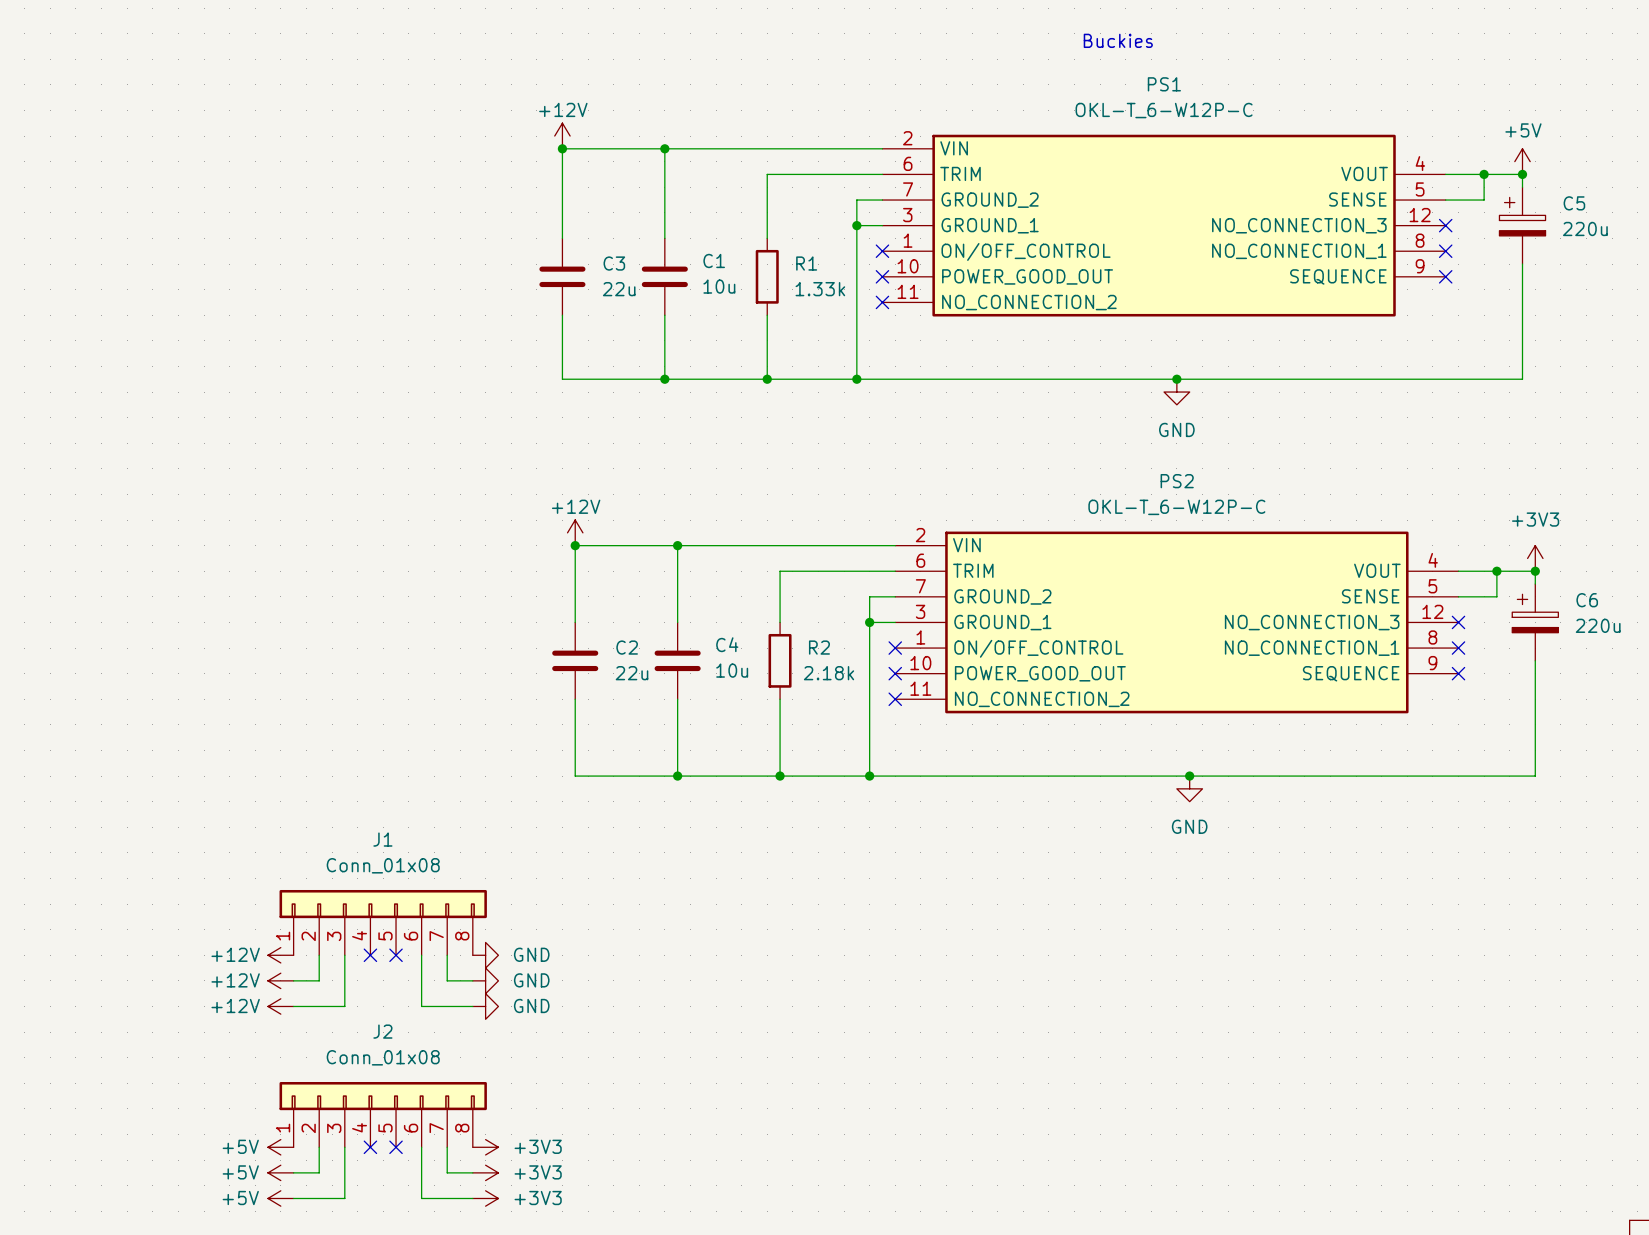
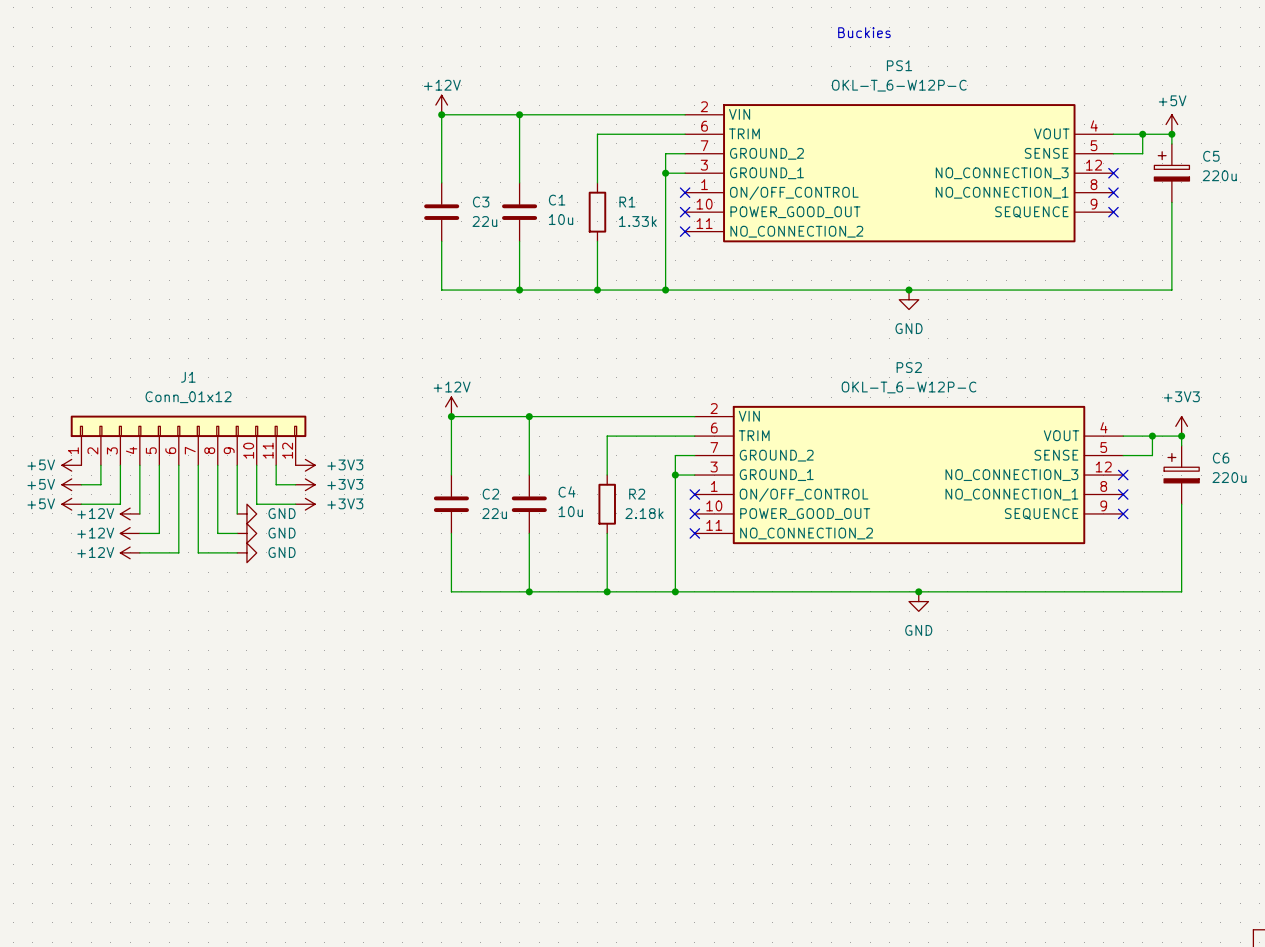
power symbol: none -> +5V (71, 465)
wire: none -> (100, 465) (100, 484) (81, 484)
wire: none -> (120, 465) (120, 504) (81, 504)
wire: none -> (139, 465) (139, 513)
wire: none -> (159, 465) (159, 533) (139, 533)
wire: none -> (178, 465) (178, 552) (139, 552)
wire: none -> (198, 465) (198, 552) (237, 552)
wire: none -> (217, 465) (217, 533) (237, 533)
wire: none -> (237, 465) (237, 513)
wire: none -> (256, 465) (256, 504) (295, 504)
wire: none -> (276, 465) (276, 484) (295, 484)
power symbol: none -> +3V3 (305, 465)
power symbol: none -> +5V (71, 484)
power symbol: none -> +3V3 (305, 484)
power symbol: none -> +5V (71, 504)
power symbol: none -> +3V3 (305, 504)
power symbol: none -> +12V (130, 513)
power symbol: none -> GND (246, 513)
power symbol: none -> +12V (130, 533)
power symbol: none -> GND (246, 533)
power symbol: none -> +12V (130, 552)
power symbol: none -> GND (246, 552)
J1 value: Conn_01x08 (383, 865) -> Conn_01x12 (188, 397)
J1 symbol: [279, 889, 487, 956] -> [70, 415, 307, 466]
power symbol: +12V (280, 955) -> none
wire: (319, 955) (319, 980) (293, 980) -> none
wire: (344, 955) (344, 1006) (293, 1006) -> none
no-connect mark: (370, 955) -> none
no-connect mark: (396, 955) -> none
wire: (421, 955) (421, 1006) (472, 1006) -> none
wire: (447, 955) (447, 980) (472, 980) -> none
power symbol: GND (485, 955) -> none
power symbol: +12V (280, 980) -> none
power symbol: GND (485, 980) -> none
power symbol: +12V (280, 1006) -> none
power symbol: GND (485, 1006) -> none
J2: Conn_01x08 (383, 1114) -> none
power symbol: +5V (280, 1147) -> none
wire: (319, 1147) (319, 1172) (293, 1172) -> none
wire: (344, 1147) (344, 1198) (293, 1198) -> none
no-connect mark: (370, 1147) -> none
no-connect mark: (396, 1147) -> none
wire: (421, 1147) (421, 1198) (472, 1198) -> none
wire: (447, 1147) (447, 1172) (472, 1172) -> none
power symbol: +3V3 (485, 1147) -> none
power symbol: +5V (280, 1172) -> none
power symbol: +3V3 (485, 1172) -> none
power symbol: +5V (280, 1198) -> none
power symbol: +3V3 (485, 1198) -> none

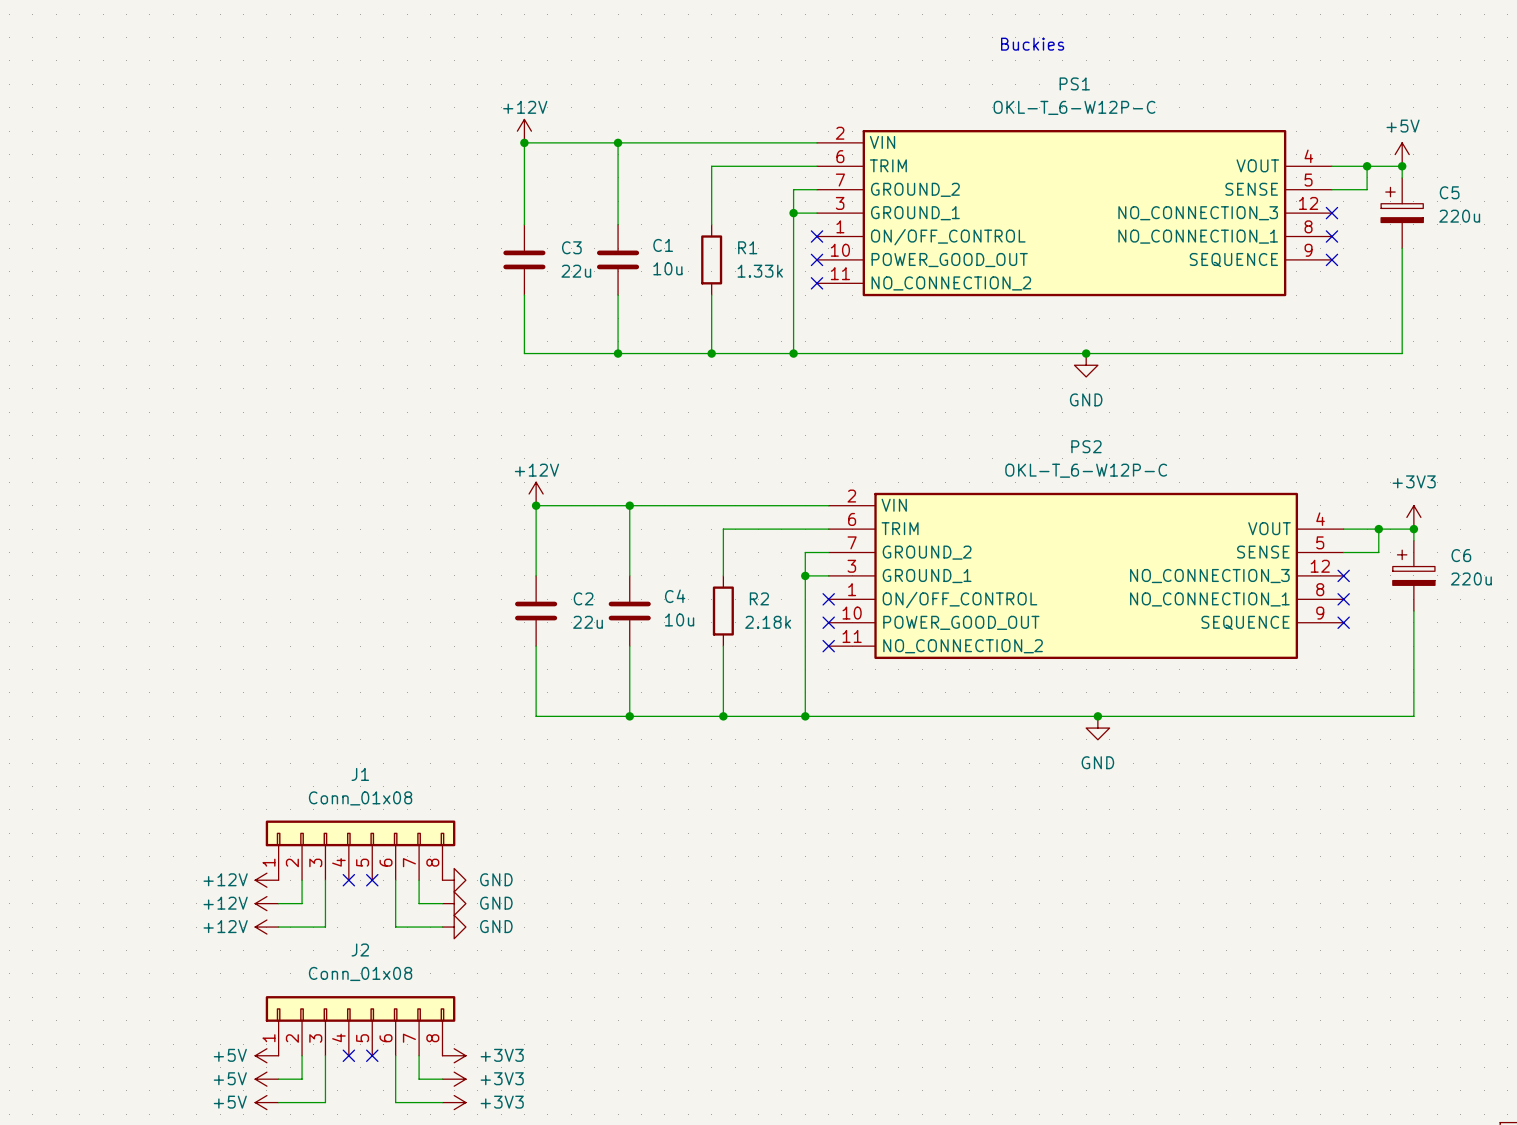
J1 value: Conn_01x12 (188, 397) -> Conn_01x08 (360, 798)
J1 symbol: [70, 415, 307, 466] -> [265, 820, 456, 881]
power symbol: +5V (71, 465) -> none
wire: (100, 465) (100, 484) (81, 484) -> none
wire: (120, 465) (120, 504) (81, 504) -> none
wire: (139, 465) (139, 513) -> none
wire: (159, 465) (159, 533) (139, 533) -> none
wire: (178, 465) (178, 552) (139, 552) -> none
wire: (198, 465) (198, 552) (237, 552) -> none
wire: (217, 465) (217, 533) (237, 533) -> none
wire: (237, 465) (237, 513) -> none
wire: (256, 465) (256, 504) (295, 504) -> none
wire: (276, 465) (276, 484) (295, 484) -> none
power symbol: +3V3 (305, 465) -> none
power symbol: +5V (71, 484) -> none
power symbol: +3V3 (305, 484) -> none
power symbol: +5V (71, 504) -> none
power symbol: +3V3 (305, 504) -> none
power symbol: +12V (130, 513) -> none
power symbol: GND (246, 513) -> none
power symbol: +12V (130, 533) -> none
power symbol: GND (246, 533) -> none
power symbol: +12V (130, 552) -> none
power symbol: GND (246, 552) -> none
power symbol: none -> +12V (266, 880)
wire: none -> (302, 880) (302, 903) (278, 903)
wire: none -> (325, 880) (325, 927) (278, 927)
no-connect mark: none -> (348, 880)
no-connect mark: none -> (372, 880)
wire: none -> (395, 880) (395, 927) (442, 927)
wire: none -> (419, 880) (419, 903) (442, 903)
power symbol: none -> GND (454, 880)
power symbol: none -> +12V (266, 903)
power symbol: none -> GND (454, 903)
power symbol: none -> +12V (266, 927)
power symbol: none -> GND (454, 927)
J2: none -> Conn_01x08 (360, 1025)
power symbol: none -> +5V (266, 1055)
wire: none -> (302, 1055) (302, 1079) (278, 1079)
wire: none -> (325, 1055) (325, 1102) (278, 1102)
no-connect mark: none -> (348, 1055)
no-connect mark: none -> (372, 1055)
wire: none -> (395, 1055) (395, 1102) (442, 1102)
wire: none -> (419, 1055) (419, 1079) (442, 1079)
power symbol: none -> +3V3 (454, 1055)
power symbol: none -> +5V (266, 1079)
power symbol: none -> +3V3 (454, 1079)
power symbol: none -> +5V (266, 1102)
power symbol: none -> +3V3 (454, 1102)

